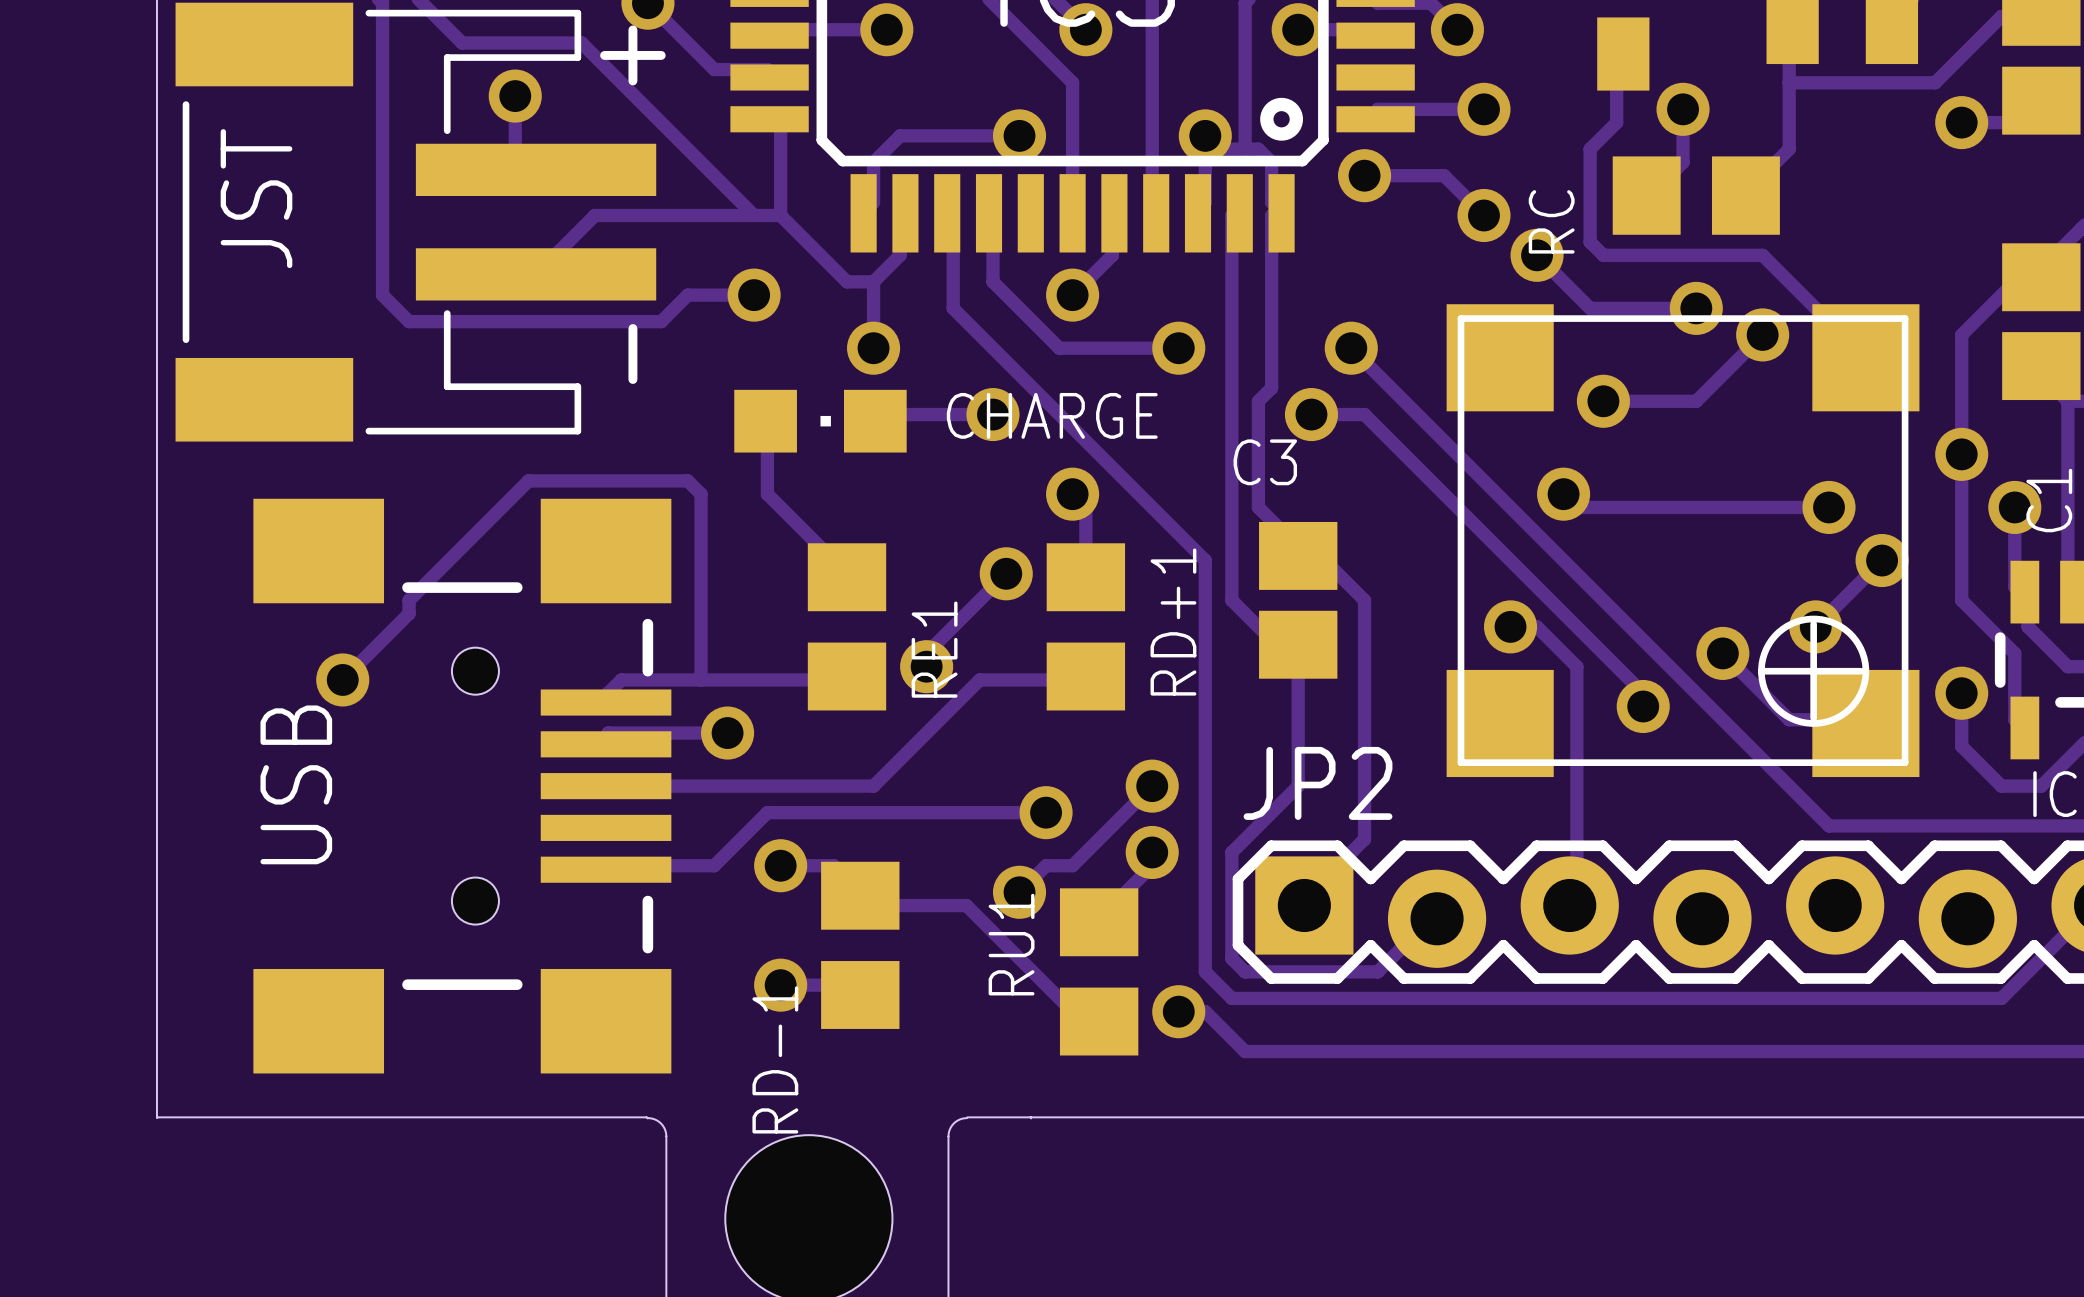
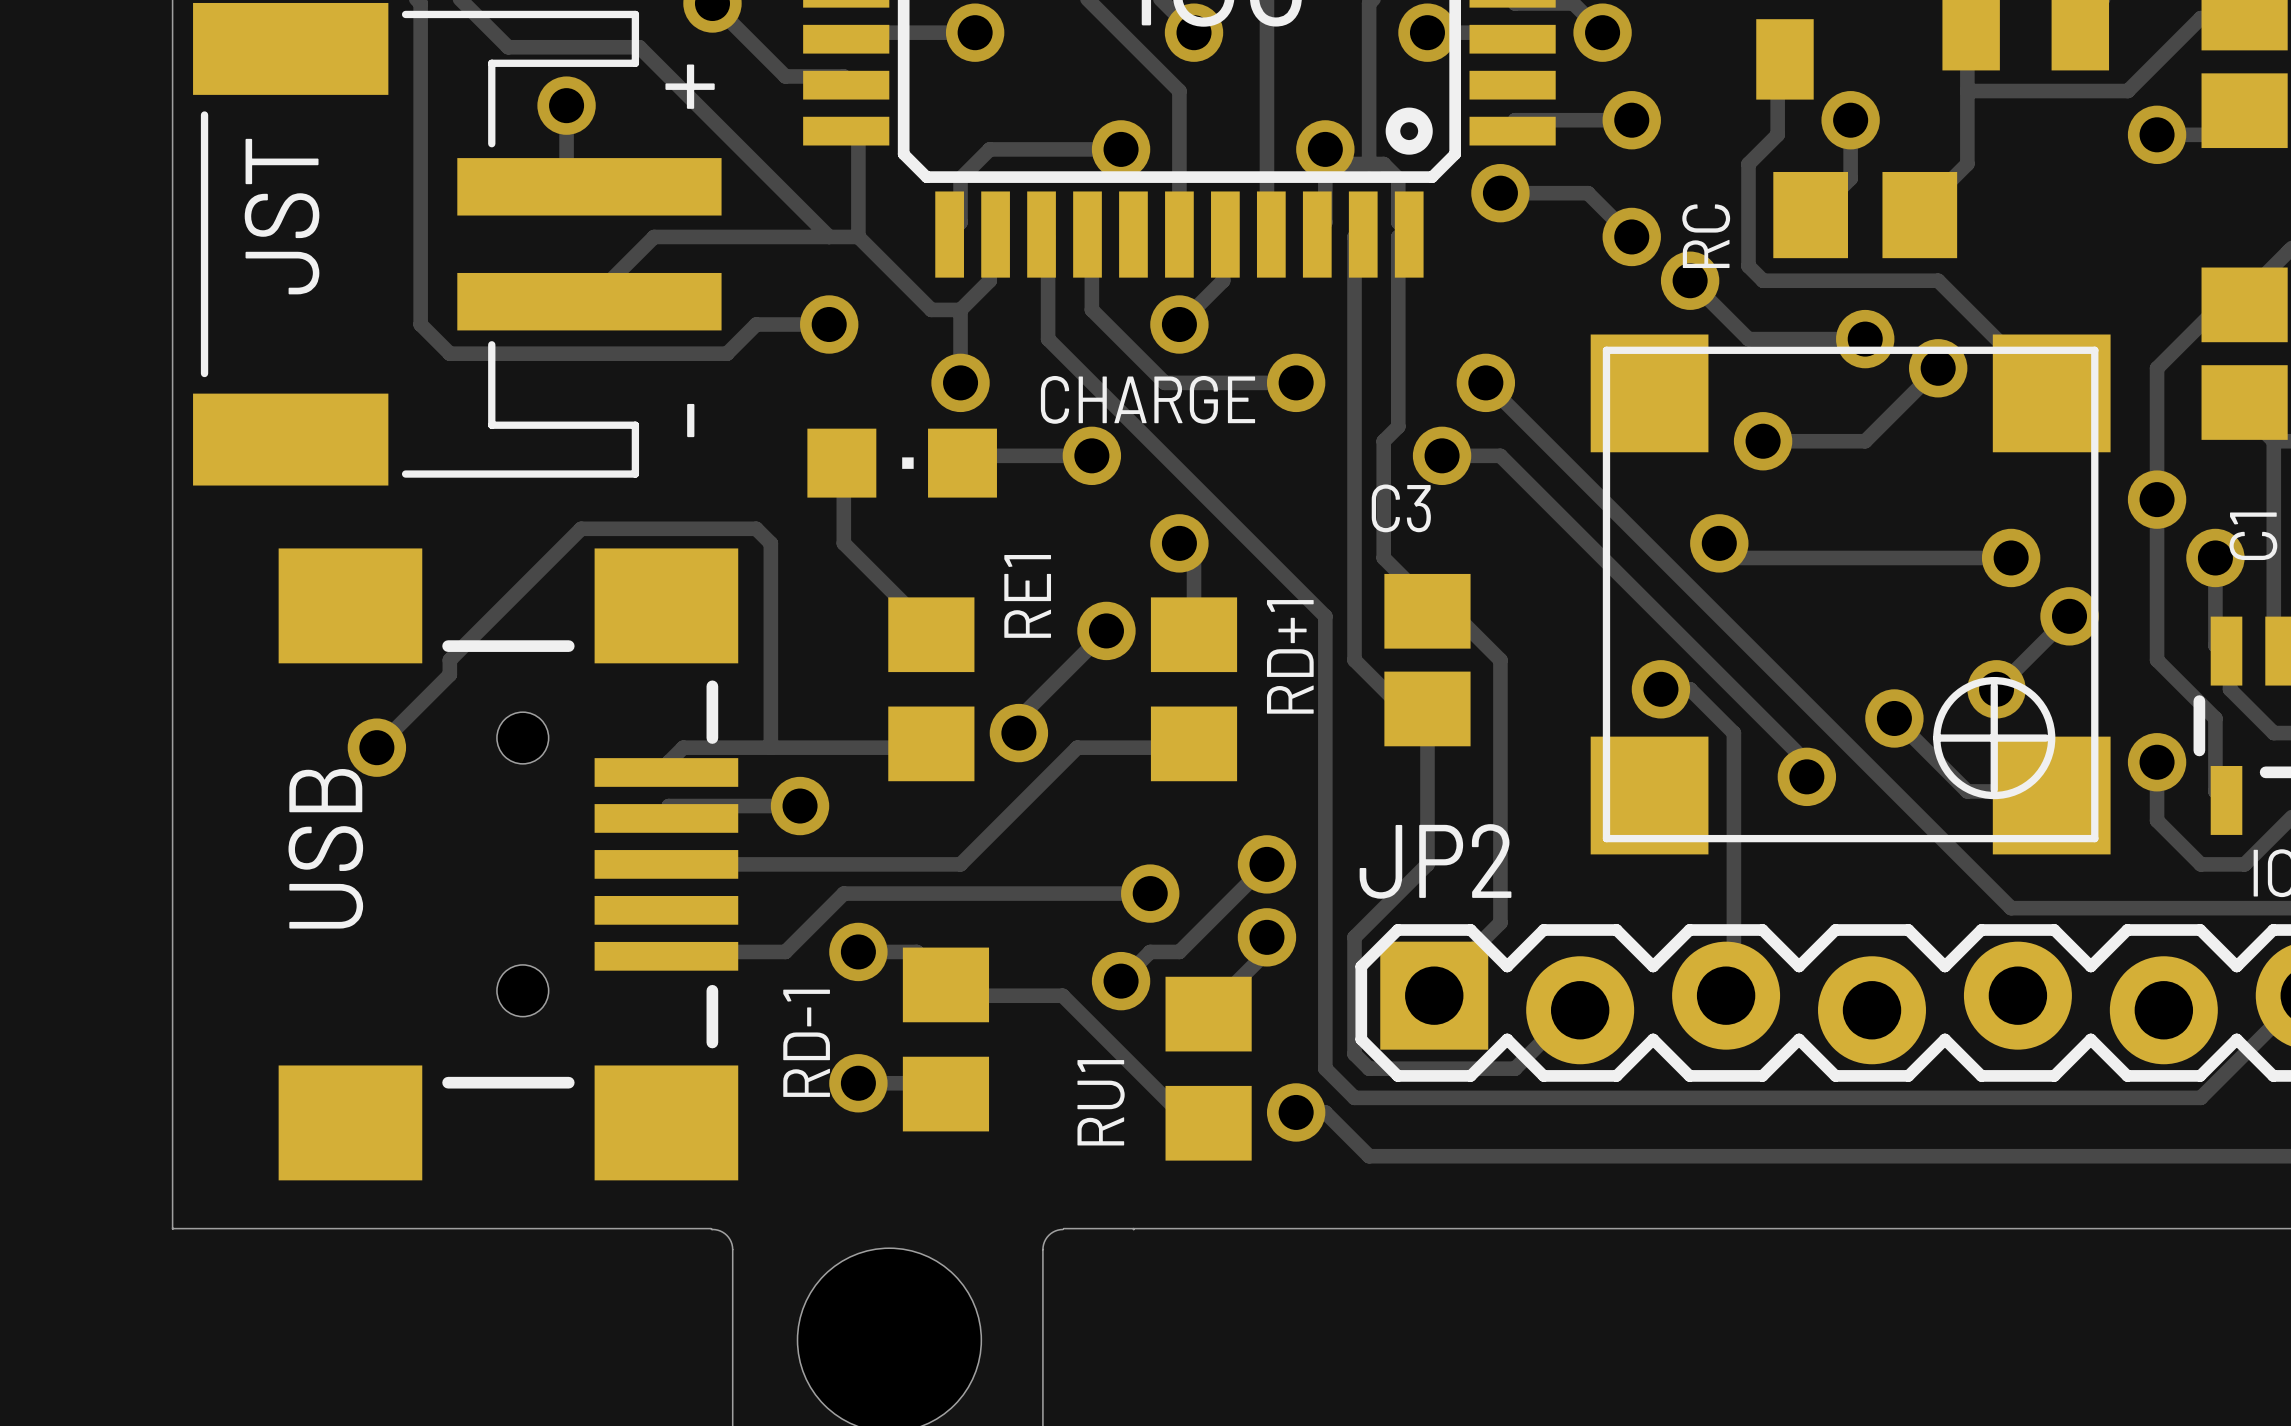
CHARGE name position: CHARGE (1052, 415) -> CHARGE (1148, 399)
RE1 name position: RE1 (934, 649) -> RE1 (1027, 596)
RU1 name position: RU1 (1011, 944) -> RU1 (1101, 1102)
RD-1 name position: RD-1 (775, 1059) -> RD-1 (806, 1043)

